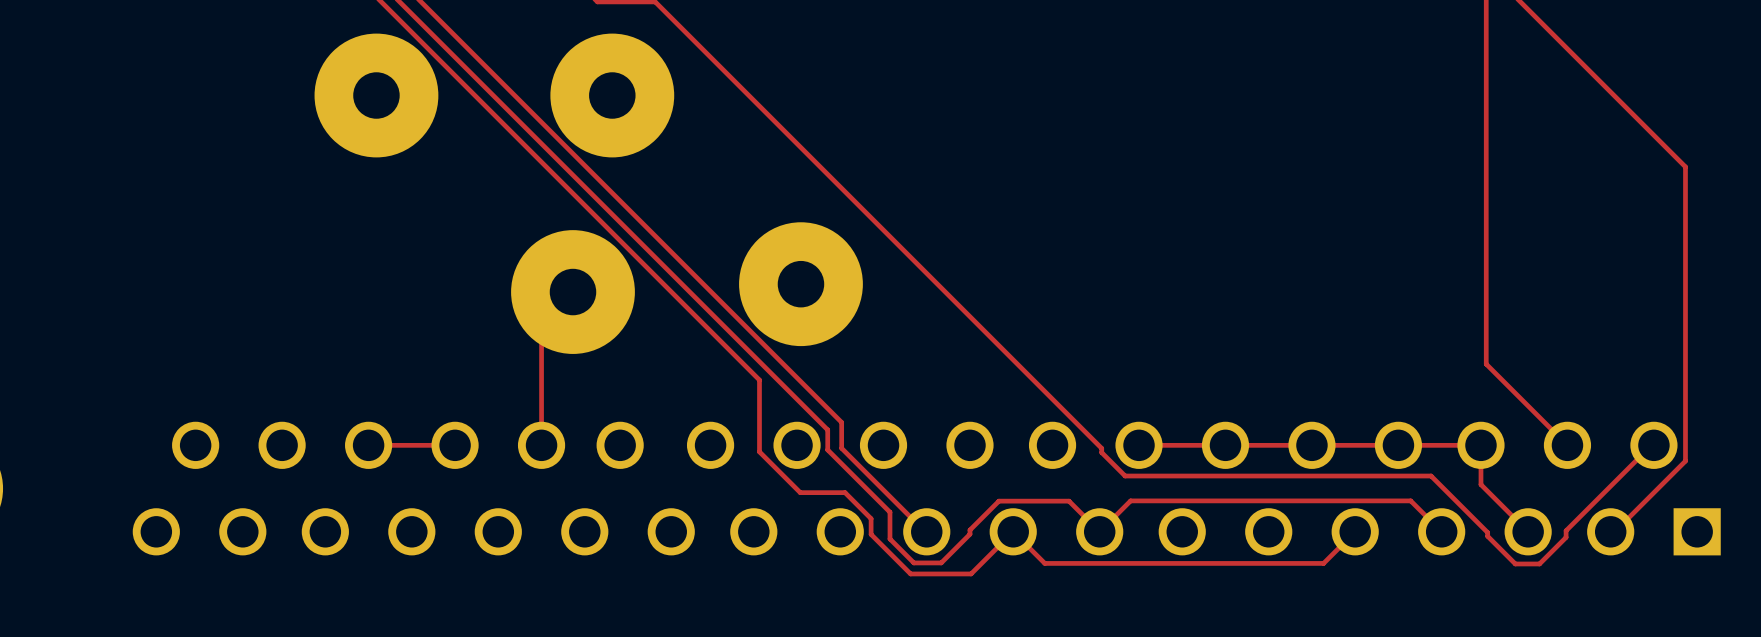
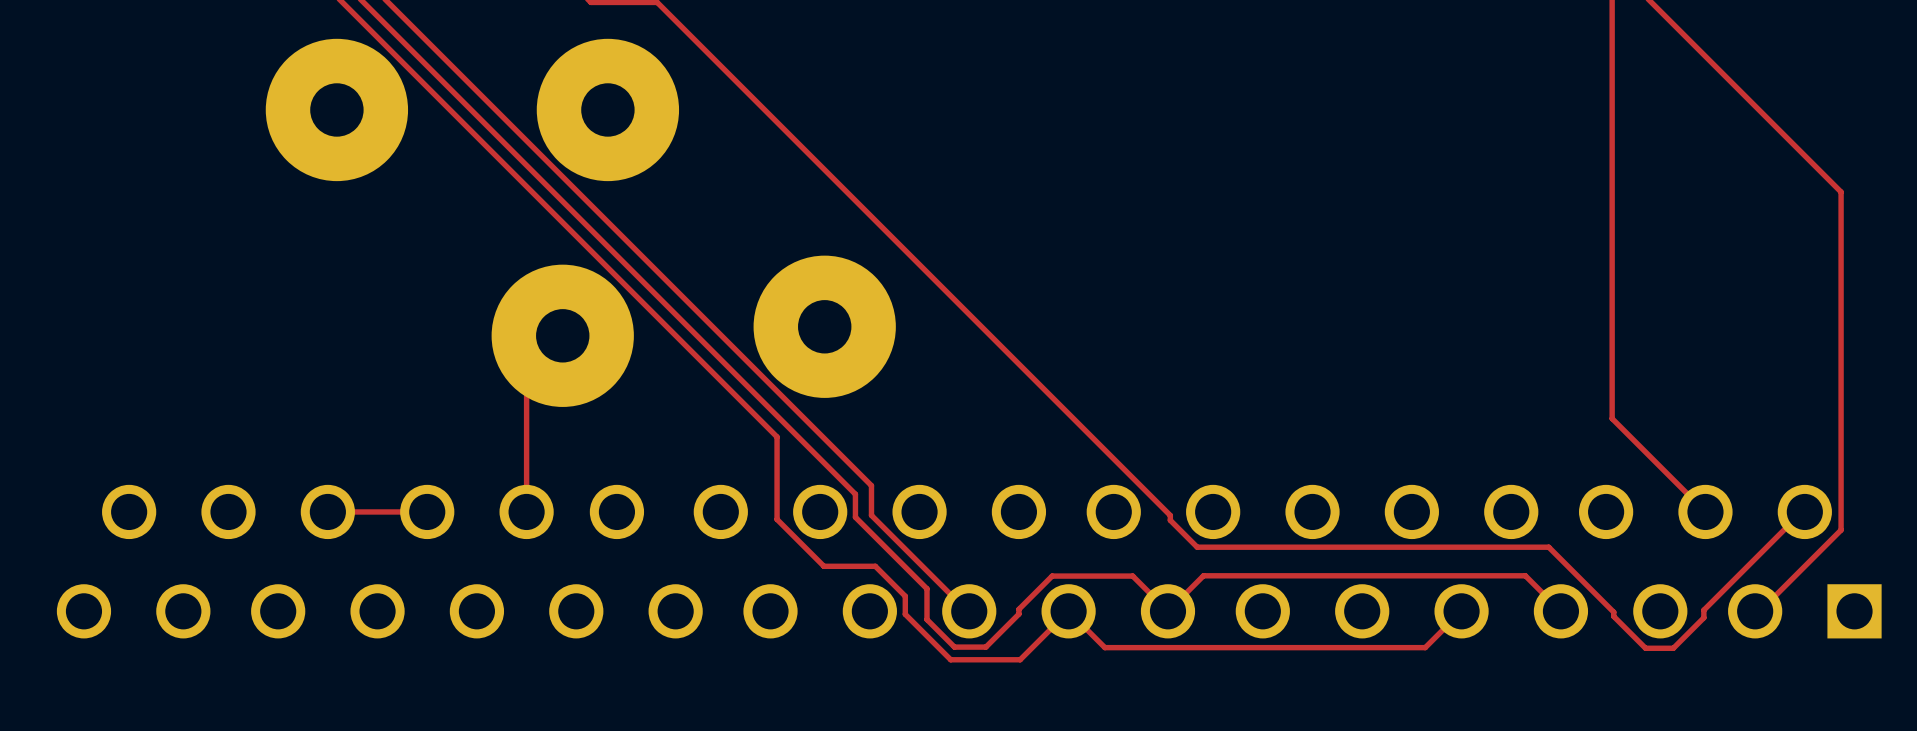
track: (1139, 445) (1480, 445) (1480, 484) (1528, 531) -> none

